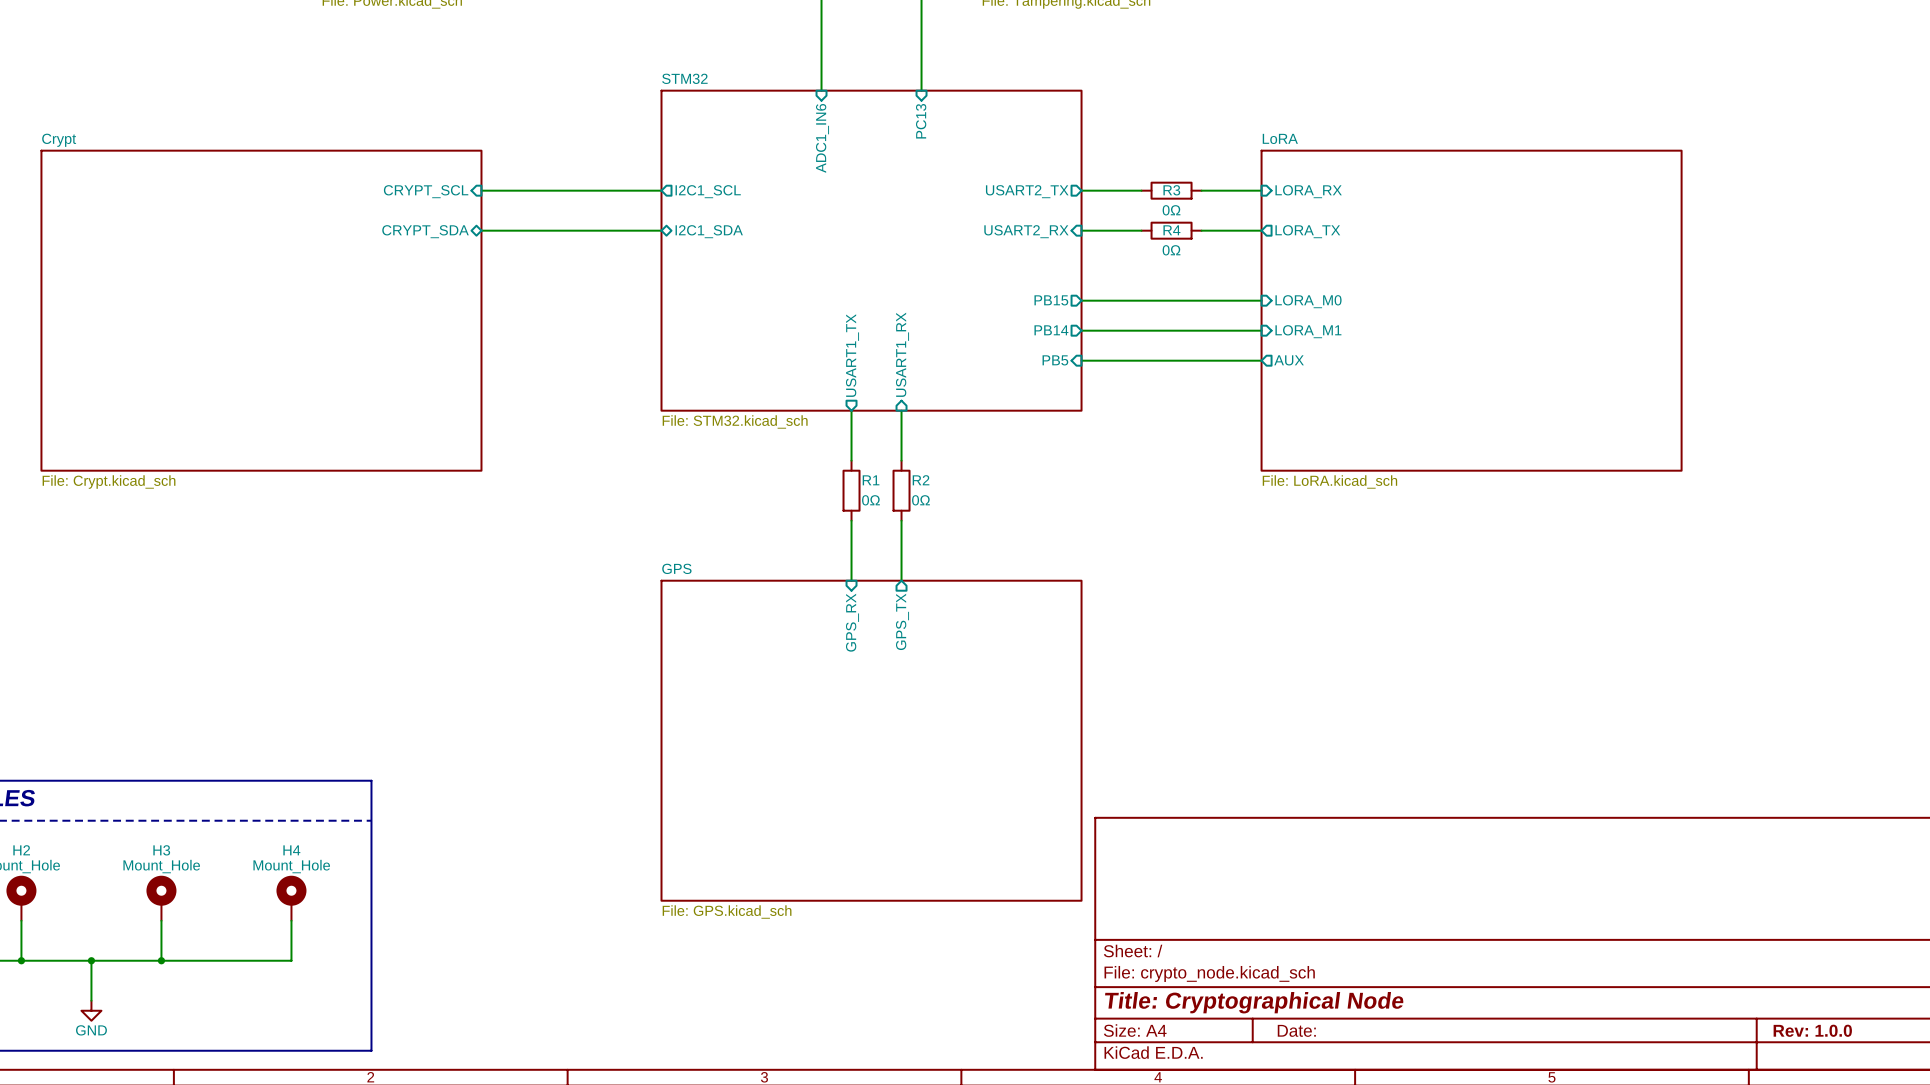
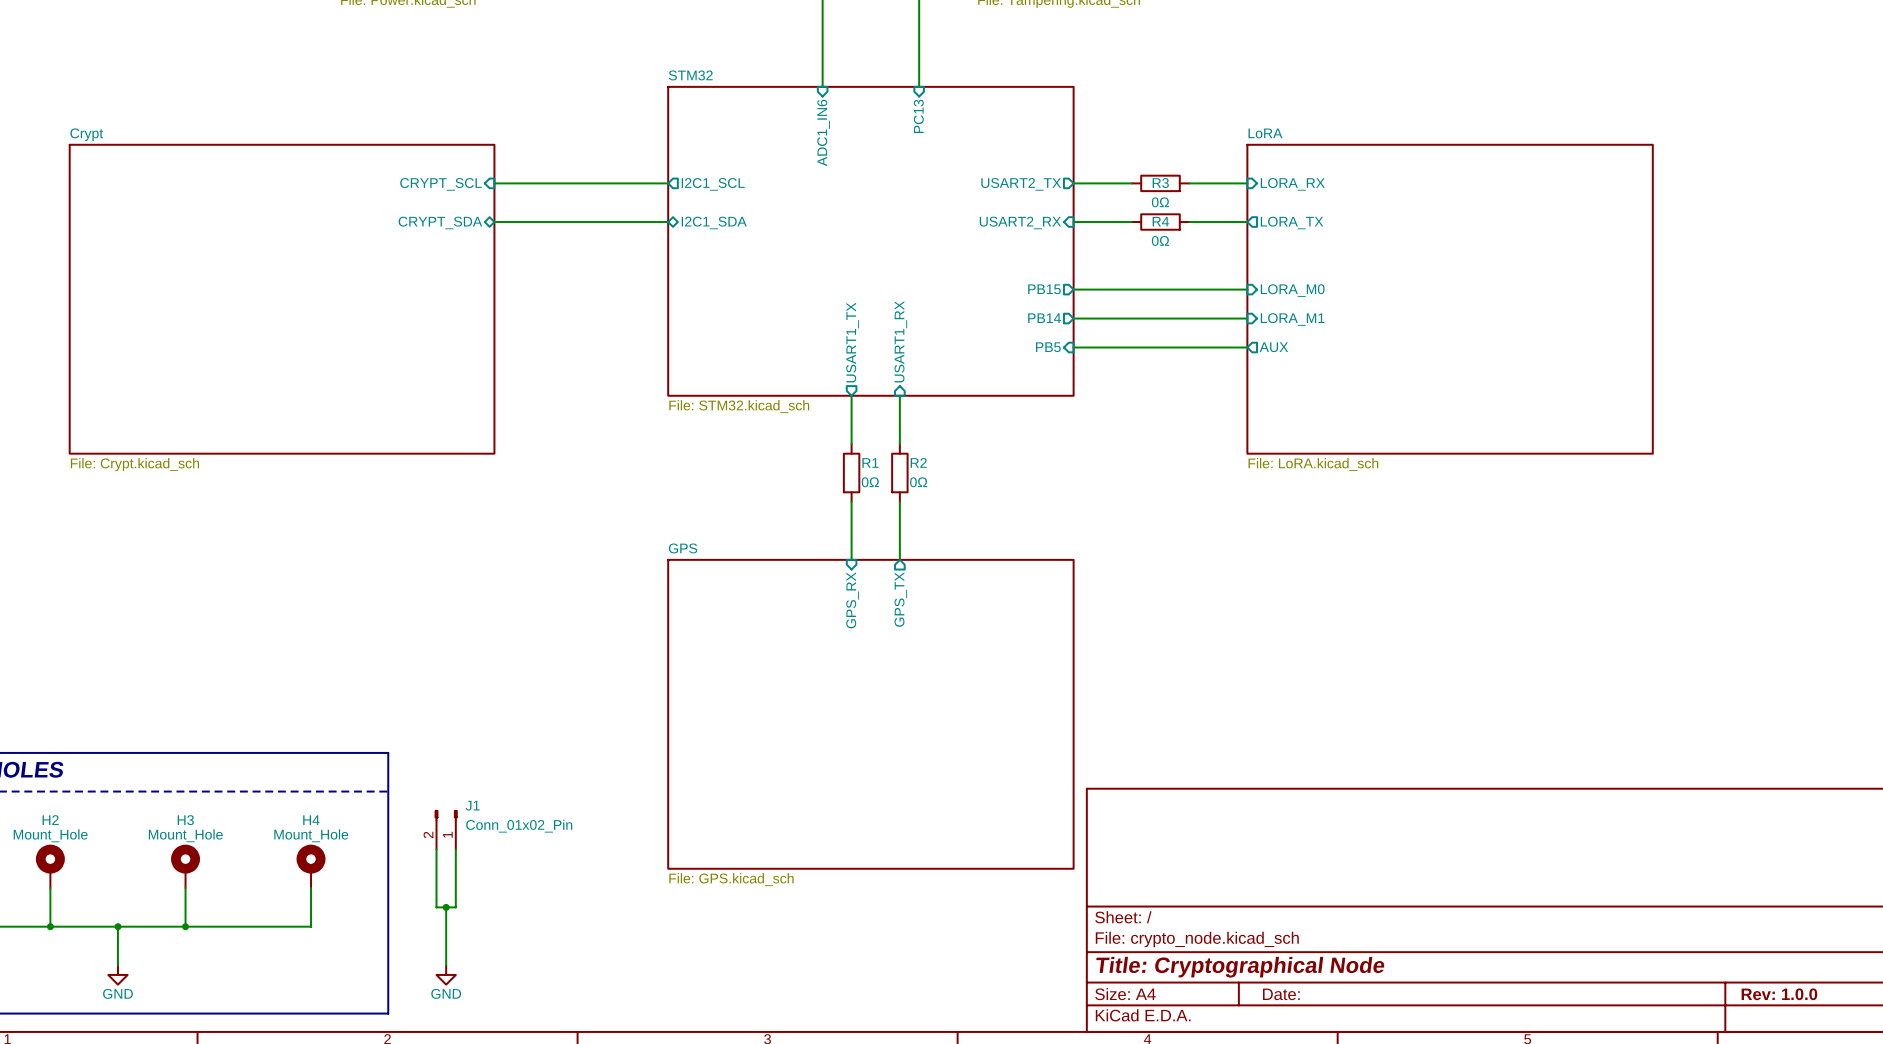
J1: none -> Conn_01x02_Pin (446, 829)
wire: none -> (436, 849) (436, 907) (455, 907) (455, 849)
wire: none -> (446, 907) (446, 965)
junction: none -> (446, 907)
power symbol: none -> GND (446, 974)

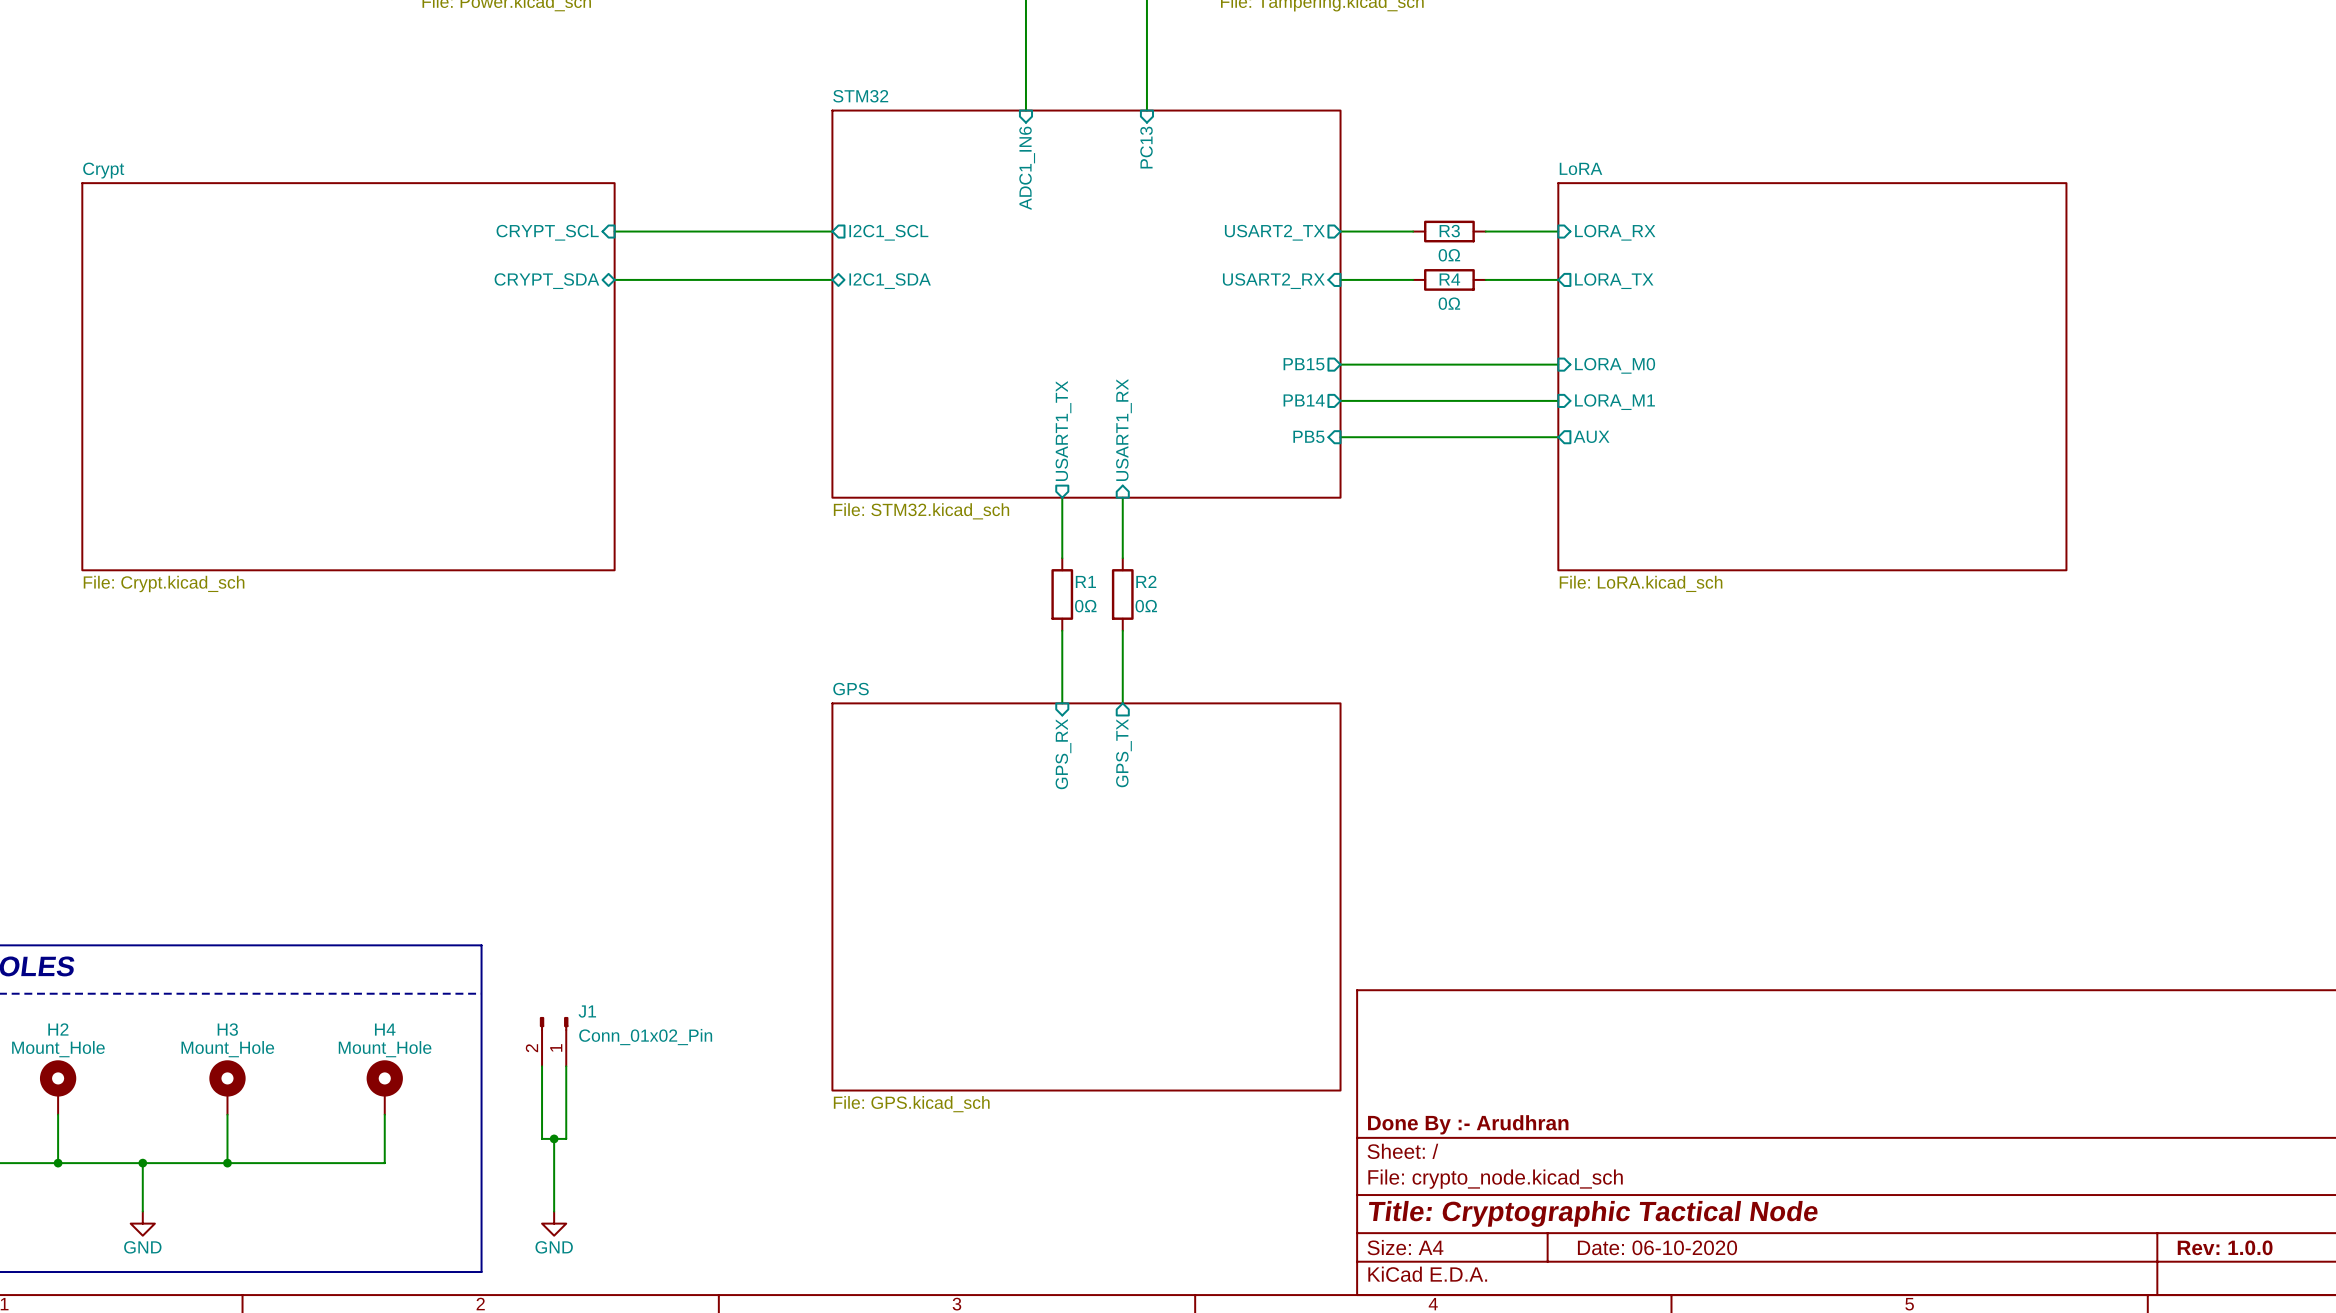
title block: none -> Done By :- Arudhran (1468, 1124)
title block: Title: Cryptographical Node (1240, 967) -> Title: Cryptographic Tactical Node (1593, 1213)
title block: Date: (1281, 994) -> Date: 06-10-2020 (1657, 1247)

